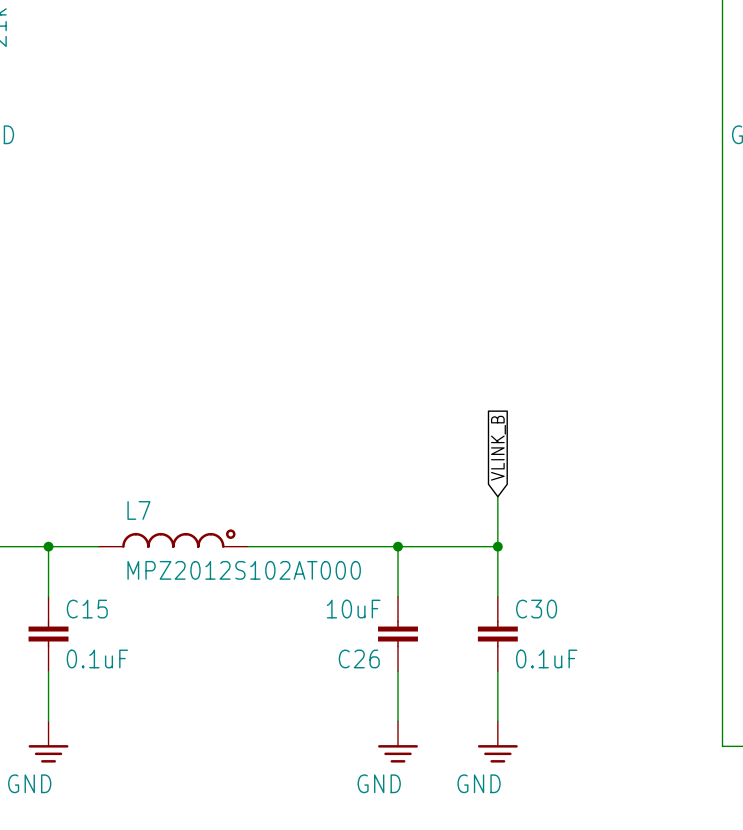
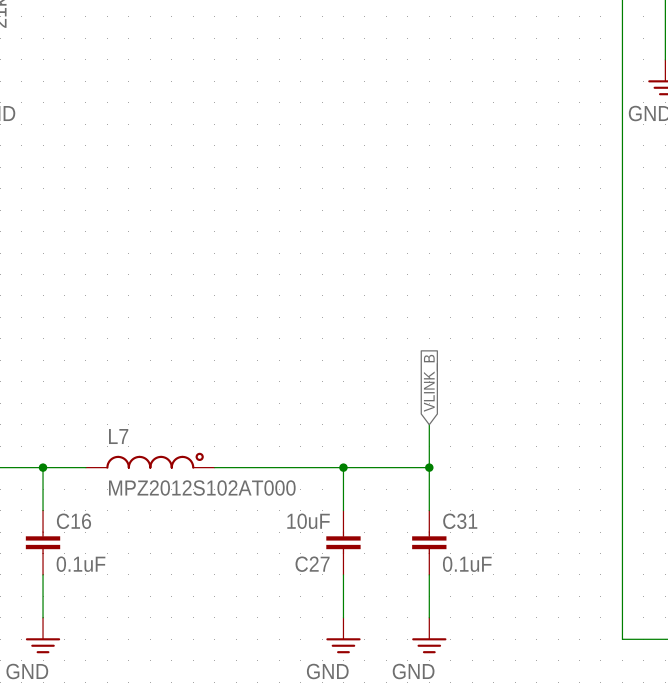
C15 name: C15 (87, 609) -> C16 (73, 521)
C30 name: C30 (536, 609) -> C31 (460, 521)
C26 name: C26 (359, 658) -> C27 (312, 564)

